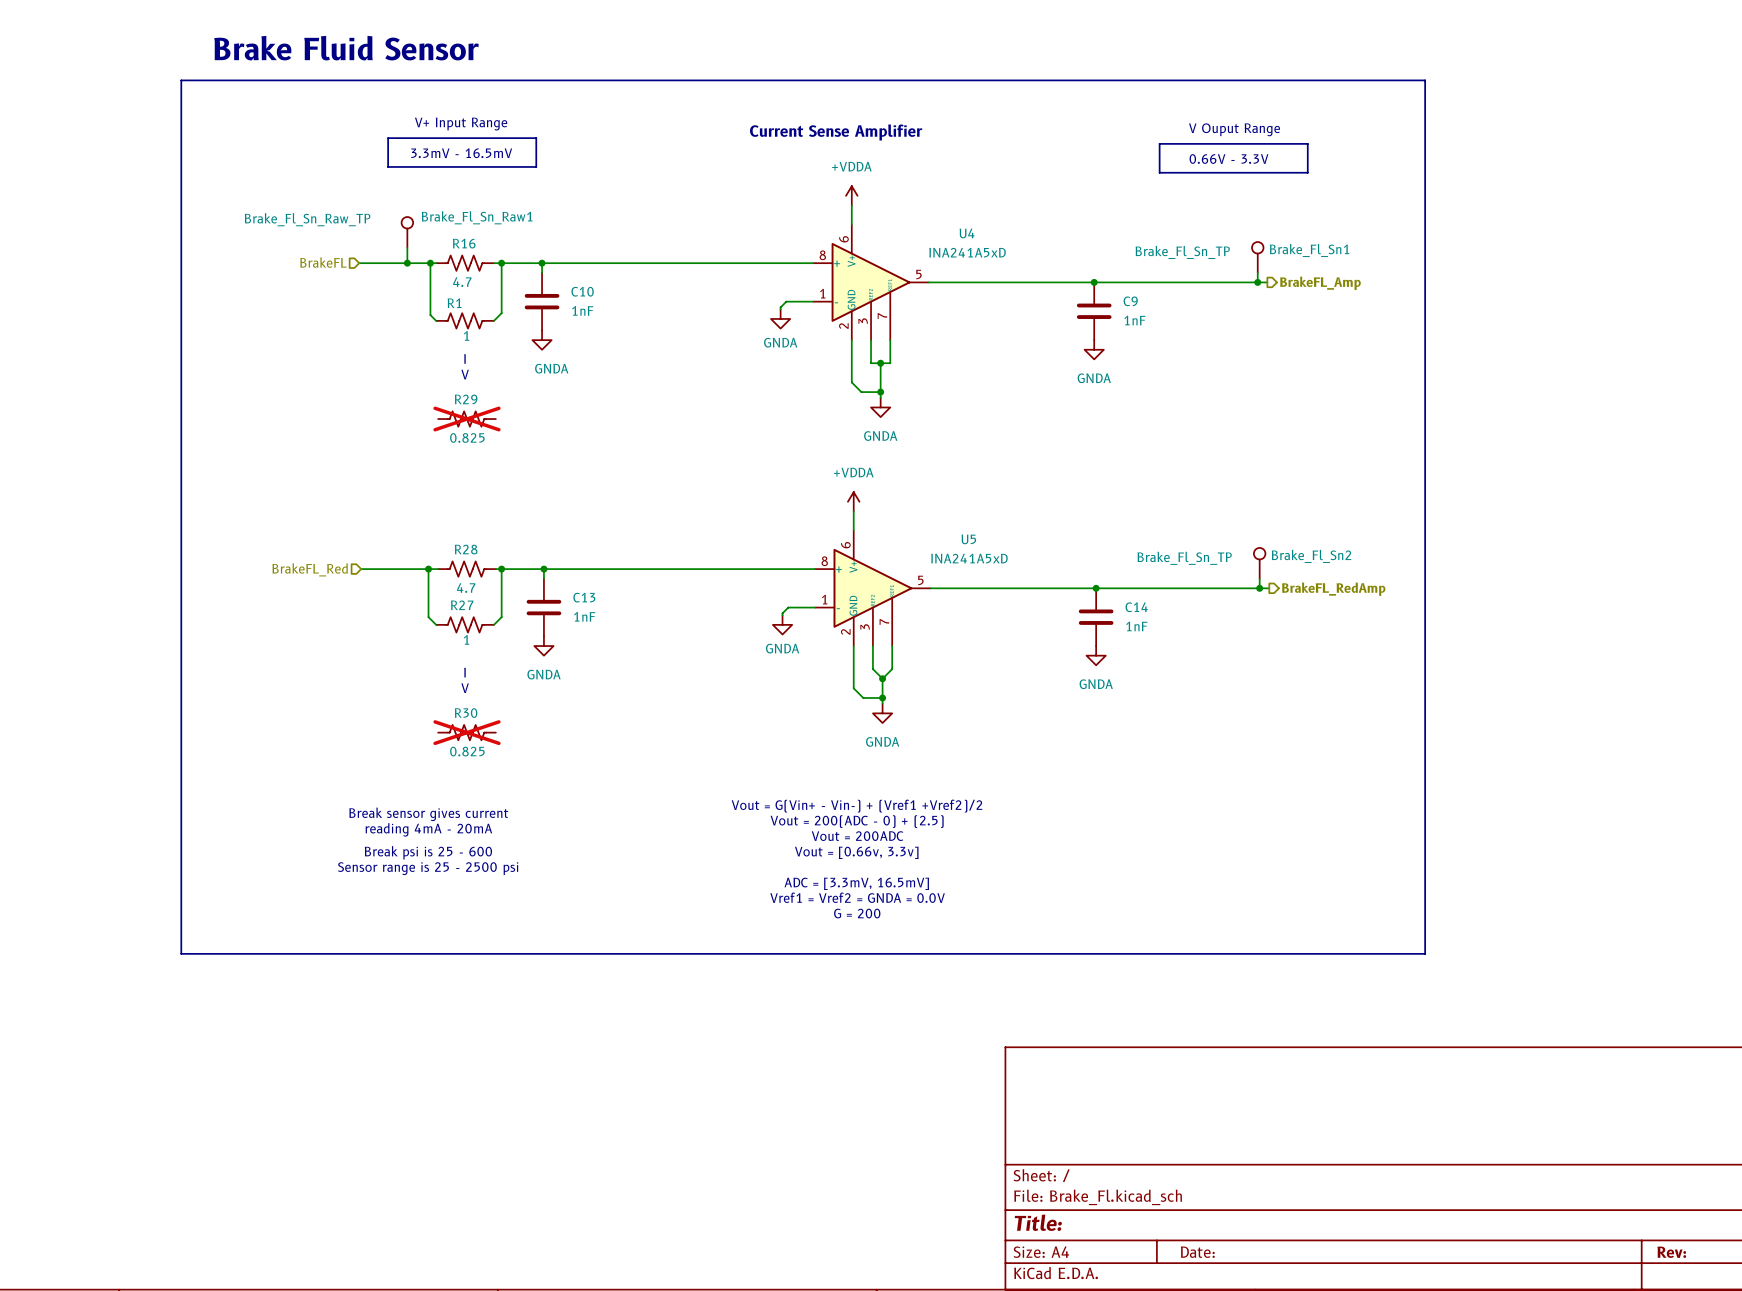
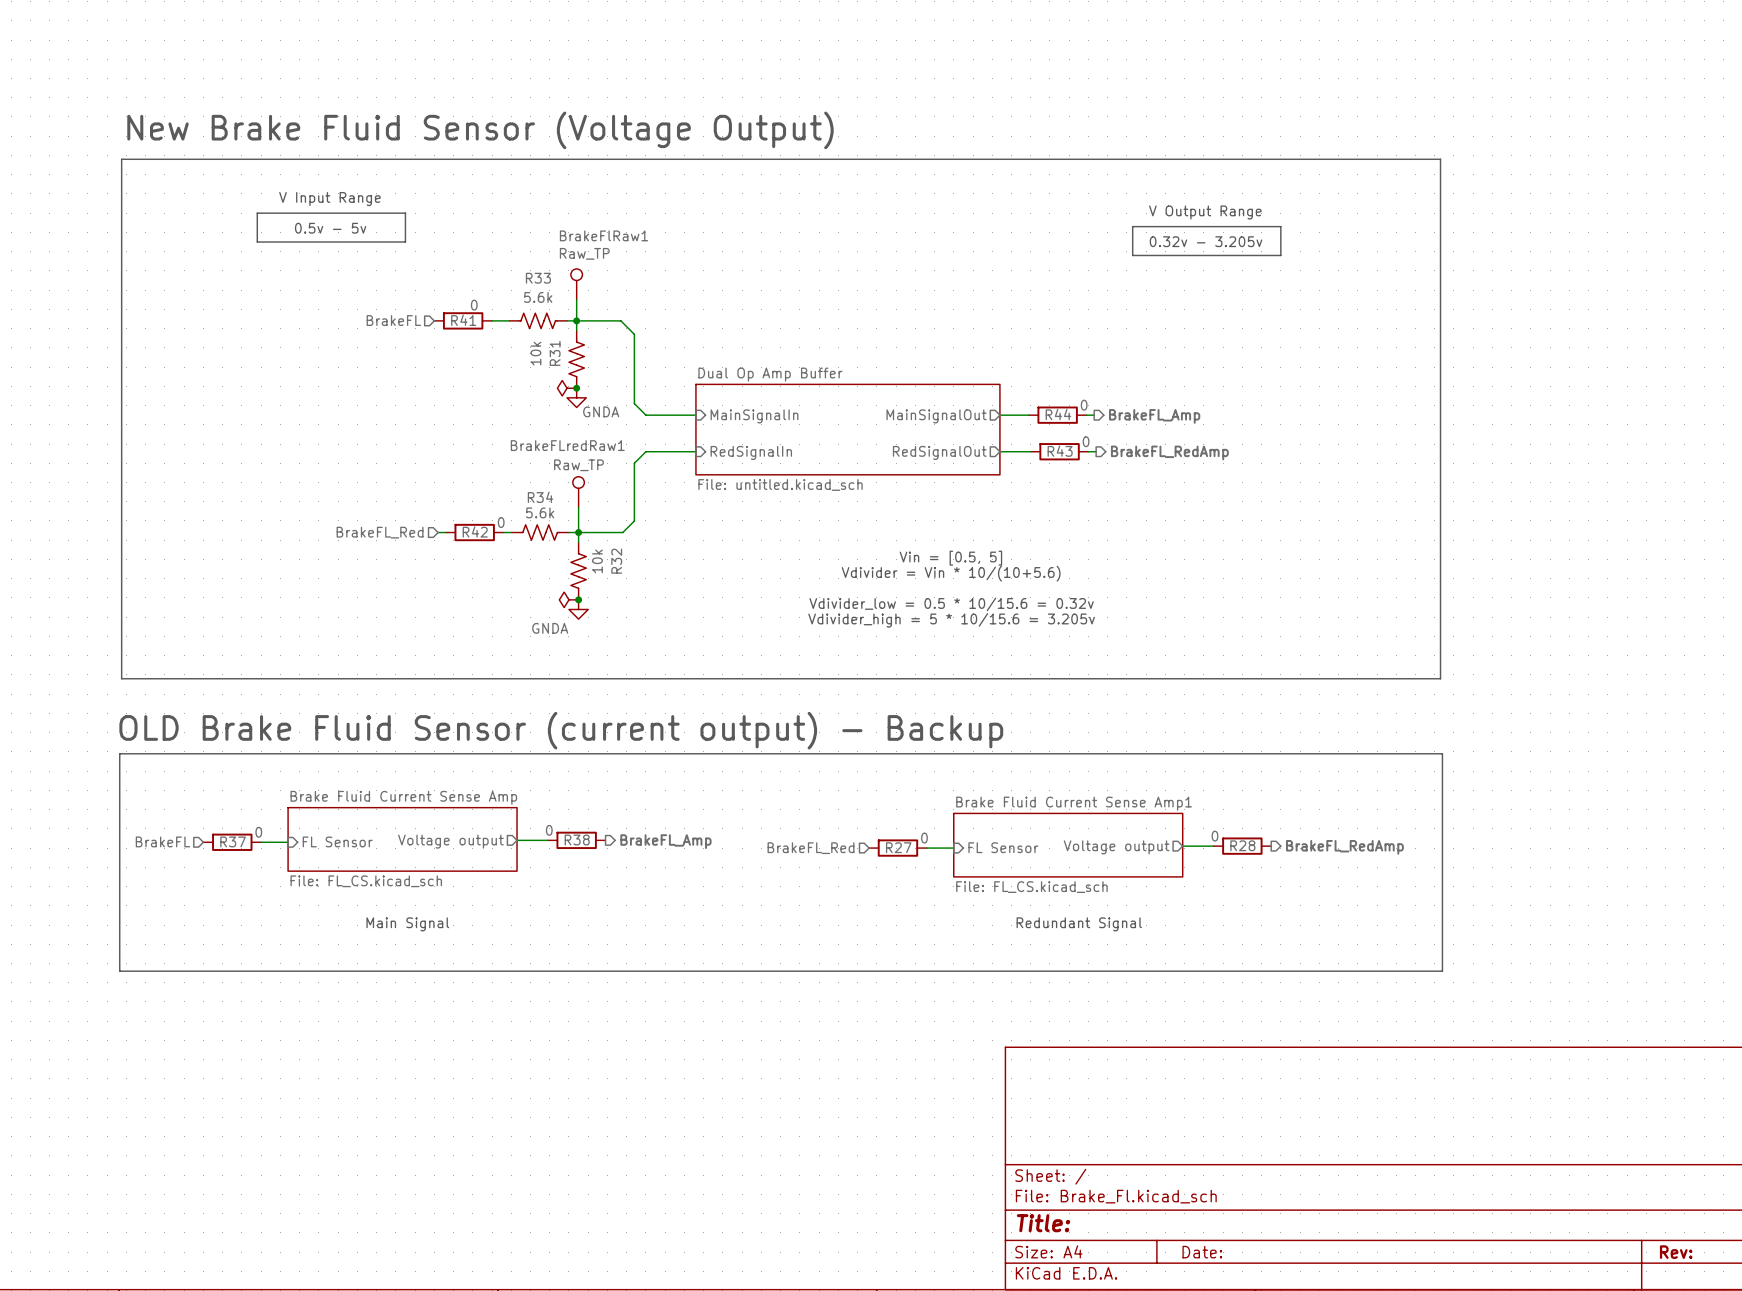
text: Brake Fluid Sensor (346, 48) -> none
line: (181, 80) (1425, 80) (1425, 953) (181, 953) (181, 80) -> (121, 159) (121, 678) (1440, 678) (1440, 159) (121, 159)
text: V+ Input Range (461, 124) -> none
text: V Ouput Range (1234, 129) -> none
text: none -> New Brake Fluid Sensor (Voltage Output) (480, 130)
text: Current Sense Amplifier (836, 132) -> none
line: (388, 138) (536, 138) (536, 166) (388, 166) (388, 138) -> (257, 213) (405, 213) (405, 242) (257, 242) (257, 213)
line: (1159, 143) (1307, 143) (1307, 172) (1159, 172) (1159, 143) -> (1132, 226) (1280, 226) (1280, 255) (1132, 255) (1132, 226)
text: 3.3mV - 16.5mV (461, 153) -> none
text: 0.66V - 3.3V (1228, 159) -> none
power symbol: +VDDA (851, 195) -> none
text: none -> V Input Range (329, 199)
wire: (851, 205) (851, 224) -> none
text: none -> V Output Range (1205, 212)
text: none -> 0.5v - 5v (330, 228)
Brake_Fl_Sn_Raw1: Brake_Fl_Sn_Raw_TP (407, 232) -> none
text: none -> 0.32v - 3.205v (1206, 241)
wire: (407, 247) (407, 263) -> none
Brake_Fl_Sn1: Brake_Fl_Sn_TP (1257, 257) -> none
hierarchical label position: BrakeFL (323, 262) -> BrakeFL (393, 320)
wire: (359, 263) (436, 263) -> none
junction: (407, 263) -> none
wire: (430, 263) (430, 315) (436, 320) -> none
junction: (430, 263) -> none
R16: 4.7 (465, 263) -> none
wire: (493, 263) (813, 263) -> none
wire: (501, 263) (501, 313) (493, 320) -> none
junction: (501, 263) -> none
wire: (542, 263) (542, 272) -> none
junction: (542, 263) -> none
wire: (1257, 272) (1257, 282) -> none
U4: INA241A5xD (871, 282) -> none
wire: (928, 282) (1267, 282) -> none
junction: (1094, 282) -> none
junction: (1257, 282) -> none
hierarchical label: BrakeFL_Amp (1320, 283) -> none
BrakeFlRaw1: none -> Raw_TP (576, 284)
wire: none -> (576, 299) (576, 330)
C10: 1nF (542, 301) -> none
wire: (813, 301) (786, 301) (780, 309) -> none
C9: 1nF (1094, 311) -> none
power symbol: GNDA (780, 318) -> none
R41: none -> 0 (463, 320)
R1: 1 (465, 320) -> none
wire: none -> (492, 320) (509, 320)
R33: none -> 5.6k (538, 320)
wire: none -> (567, 320) (576, 320)
junction: none -> (576, 320)
wire: none -> (580, 320) (620, 320) (634, 334) (634, 403) (645, 415) (695, 415)
power symbol position: GNDA (542, 340) -> GNDA (576, 397)
wire: (851, 340) (851, 382) (861, 392) (880, 392) -> none
wire: (871, 340) (871, 363) (890, 363) (890, 340) -> none
power symbol: GNDA (1094, 349) -> none
text: I (464, 359) -> none
R31: none -> 10k (576, 359)
wire: (880, 363) (880, 397) -> none
junction: (880, 363) -> none
power symbol text position: GNDA (551, 368) -> GNDA (601, 411)
text: V (465, 374) -> none
power symbol: none -> (567, 388)
junction: none -> (576, 388)
junction: (880, 392) -> none
power symbol: GNDA (880, 407) -> none
wire: none -> (999, 415) (1028, 415)
R44: none -> 0 (1057, 415)
wire: none -> (1086, 415) (1094, 415)
sheet pin: none -> MainSignalIn (754, 416)
sheet pin: none -> MainSignalOut (936, 416)
hierarchical label: none -> BrakeFL_Amp (1154, 416)
R29: 0.825 (467, 419) -> none
sheet Dual Op Amp Buffer: none -> File: untitled.kicad_sch (847, 429)
wire: none -> (695, 451) (645, 451) (634, 463) (634, 520) (622, 532) (580, 532)
wire: none -> (999, 451) (1030, 451)
R43: none -> 0 (1059, 451)
wire: none -> (1088, 451) (1096, 451)
sheet pin: none -> RedSignalIn (751, 452)
sheet pin: none -> RedSignalOut (939, 452)
hierarchical label: none -> BrakeFL_RedAmp (1169, 452)
BrakeFLredRaw1: none -> Raw_TP (578, 492)
power symbol: +VDDA (853, 501) -> none
wire: none -> (578, 507) (578, 542)
wire: (853, 511) (853, 530) -> none
wire: none -> (438, 532) (445, 532)
R42: none -> 0 (474, 532)
wire: none -> (503, 532) (511, 532)
R34: none -> 5.6k (540, 532)
wire: none -> (568, 532) (578, 532)
junction: none -> (578, 532)
R28 name position: R28 (466, 549) -> R28 (1242, 845)
text: none -> Vin = [0.5, 5] (950, 558)
R28 symbol: [438, 561, 496, 577] -> [1213, 837, 1272, 855]
Brake_Fl_Sn2: Brake_Fl_Sn_TP (1259, 563) -> none
hierarchical label position: BrakeFL_Red (310, 569) -> BrakeFL_Red (380, 532)
wire: (361, 569) (438, 569) -> none
wire: (428, 569) (428, 617) (436, 624) -> none
junction: (428, 569) -> none
wire: (495, 569) (815, 569) -> none
wire: (501, 569) (501, 617) (493, 624) -> none
junction: (501, 569) -> none
wire: (543, 569) (543, 578) -> none
junction: (543, 569) -> none
R32: none -> 10k (578, 571)
text: none -> Vdivider = Vin * 10/(10+5.6) (951, 573)
wire: (1259, 578) (1259, 588) -> none
R28 value: 4.7 (466, 588) -> 0 (1214, 836)
U5: INA241A5xD (872, 588) -> none
wire: (930, 588) (1269, 588) -> none
junction: (1096, 588) -> none
junction: (1259, 588) -> none
hierarchical label: BrakeFL_RedAmp (1333, 589) -> none
power symbol: none -> (568, 599)
junction: none -> (578, 599)
text: none -> Vdivider_low = 0.5 * 10/15.6 = 0.32v (951, 604)
R27 name position: R27 (462, 605) -> R27 (898, 847)
C13: 1nF (543, 607) -> none
wire: (815, 607) (788, 607) (782, 615) -> none
R27 symbol: [436, 617, 494, 633] -> [869, 839, 927, 857]
C14: 1nF (1096, 617) -> none
text: none -> Vdivider_high = 5 * 10/15.6 = 3.205v (951, 620)
power symbol: GNDA (782, 624) -> none
R27 value: 1 (466, 639) -> 0 (924, 838)
power symbol position: GNDA (543, 646) -> GNDA (578, 609)
wire: (853, 646) (853, 688) (863, 697) (882, 697) -> none
wire: (872, 646) (872, 669) (882, 678) -> none
wire: (892, 646) (892, 669) (882, 678) -> none
power symbol: GNDA (1096, 655) -> none
text: I (464, 672) -> none
power symbol text position: GNDA (544, 674) -> GNDA (550, 628)
wire: (882, 678) (882, 703) -> none
junction: (882, 678) -> none
text: V (465, 688) -> none
junction: (882, 697) -> none
power symbol: GNDA (882, 713) -> none
text: none -> OLD Brake Fluid Sensor (current output) - Backup (561, 730)
R30: 0.825 (467, 732) -> none
line: none -> (119, 753) (1442, 753) (1442, 971) (119, 971) (119, 753)
text: Vout = G(Vin+ - Vin-) + (Vref1 +Vref2)/2 (857, 806) -> none
text: Break sensor gives current (428, 814) -> none
text: Vout = 200(ADC - 0) + (2.5) (857, 821) -> none
text: reading 4mA - 20mA (428, 829) -> none
text: Vout = 200ADC (857, 836) -> none
sheet Brake Fluid Current Sense Amp: none -> File: FL_CS.kicad_sch (402, 839)
wire: none -> (517, 840) (547, 840)
R38: none -> 0 (576, 840)
hierarchical label: none -> BrakeFL (162, 841)
sheet pin: none -> FL Sensor (337, 841)
sheet pin: none -> Voltage output (450, 841)
hierarchical label: none -> BrakeFL_Amp (665, 841)
R37: none -> 0 (232, 842)
wire: none -> (261, 842) (288, 842)
sheet Brake Fluid Current Sense Amp1: none -> File: FL_CS.kicad_sch (1068, 845)
wire: none -> (1182, 846) (1213, 846)
sheet pin: none -> FL Sensor (1003, 847)
sheet pin: none -> Voltage output (1116, 847)
hierarchical label: none -> BrakeFL_RedAmp (1344, 847)
hierarchical label: none -> BrakeFL_Red (811, 848)
wire: none -> (926, 848) (953, 848)
text: Break psi is 25 - 600 (428, 852) -> none
text: Vout = [0.66v, 3.3v] (856, 852) -> none
text: Sensor range is 25 - 2500 psi (428, 868) -> none
text: ADC = [3.3mV, 16.5mV] (856, 883) -> none
text: Vref1 = Vref2 = GNDA = 0.0V (857, 897) -> none
text: G = 200 (857, 913) -> none
text: none -> Main Signal (407, 924)
text: none -> Redundant Signal (1079, 924)

